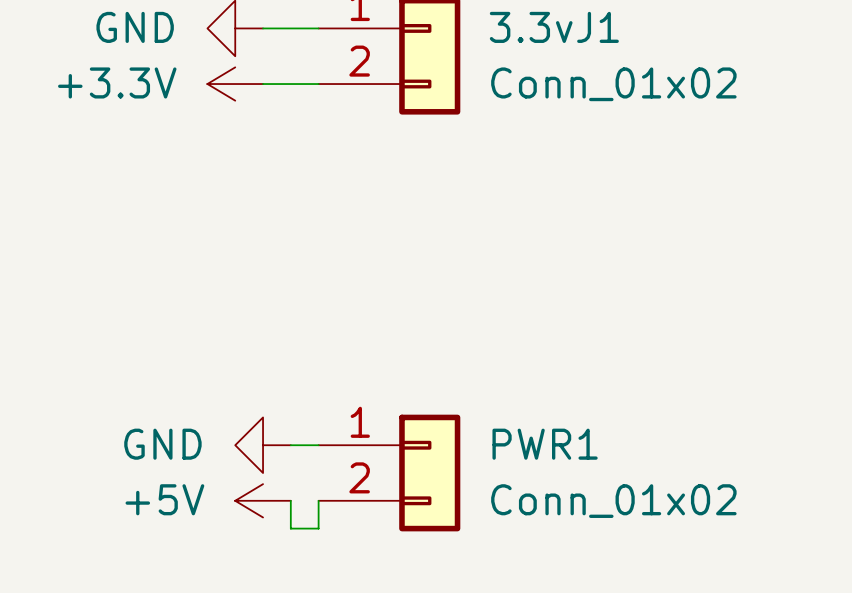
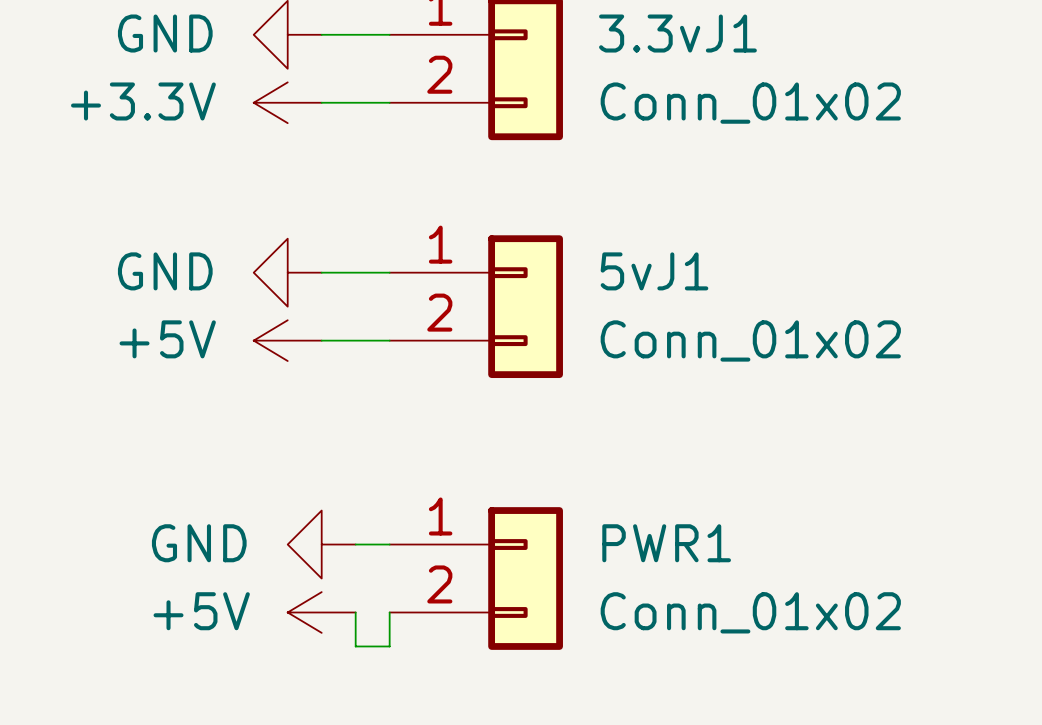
power symbol: none -> GND (287, 272)
wire: none -> (321, 272) (389, 272)
5vJ1: none -> Conn_01x02 (476, 306)
power symbol: none -> +5V (287, 340)
wire: none -> (321, 340) (389, 340)

